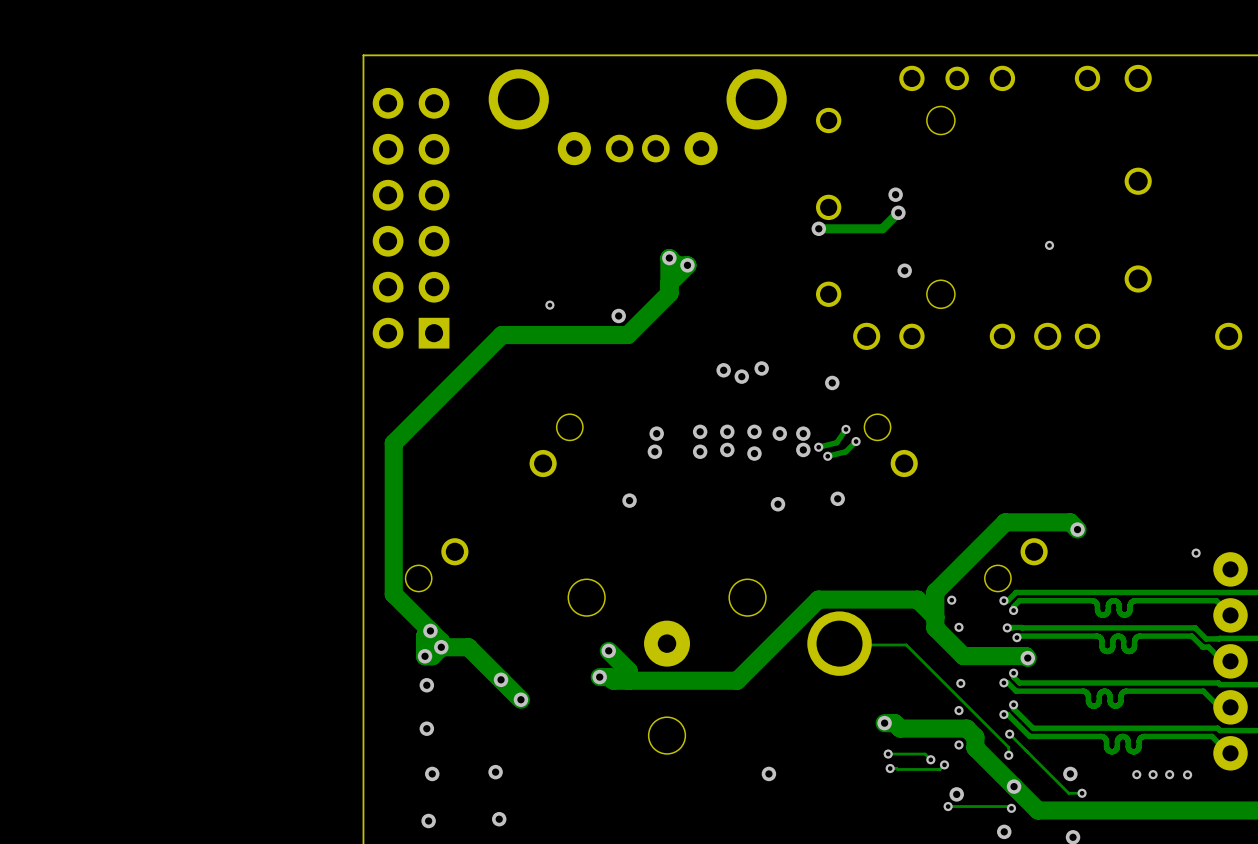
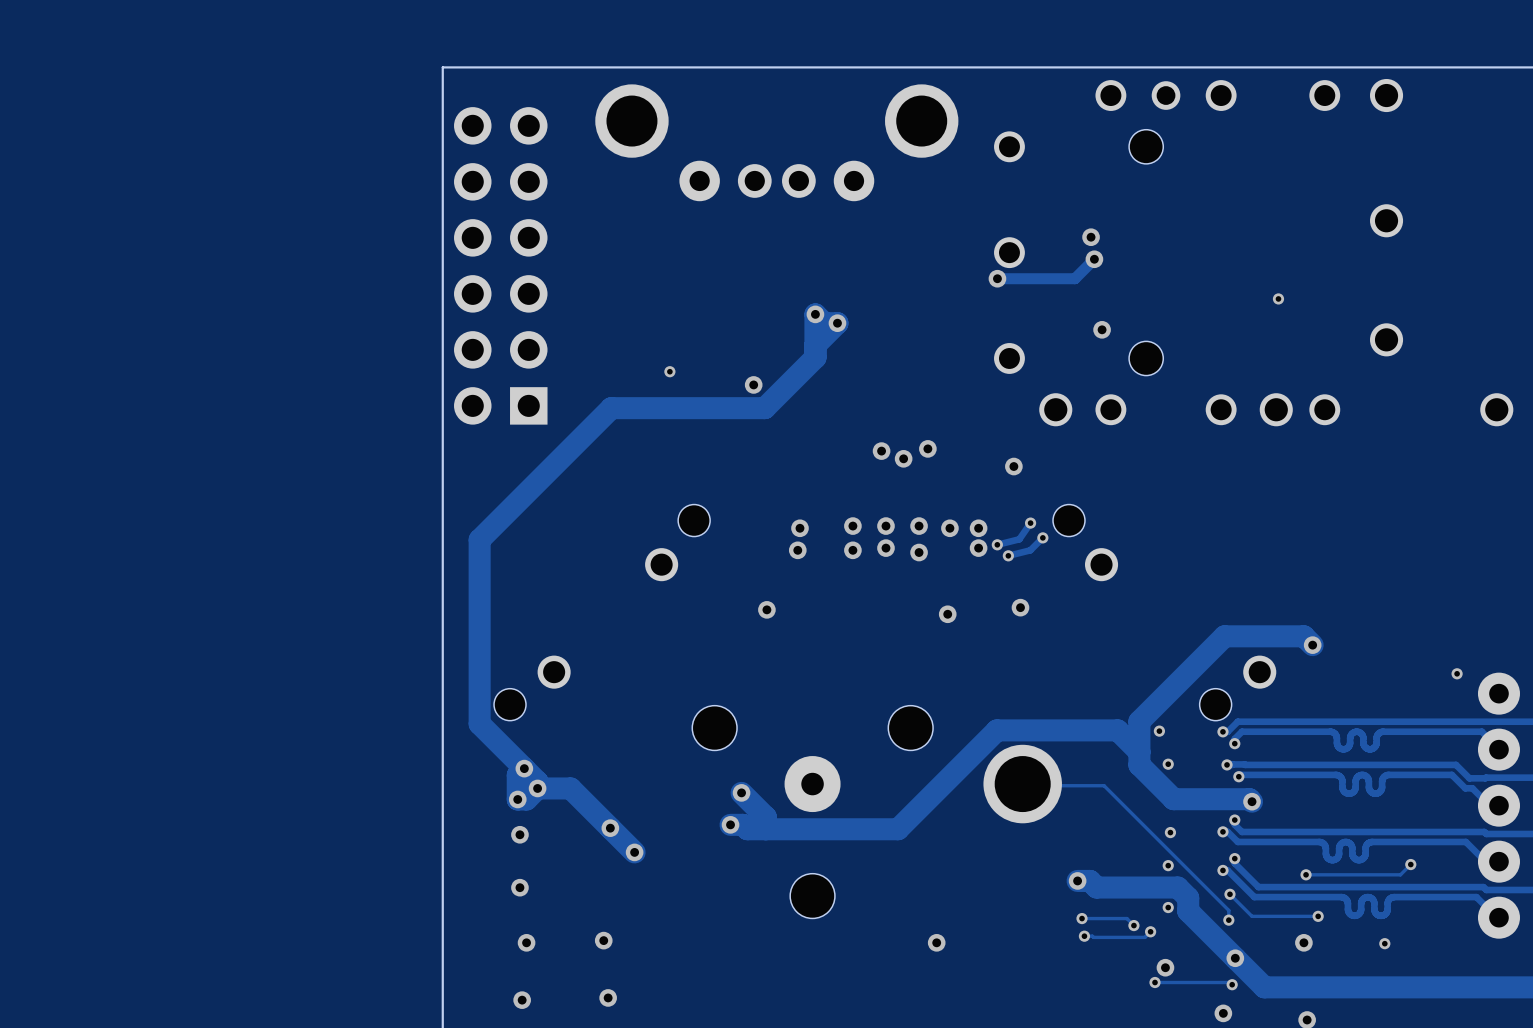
track: none -> (1410, 864) (1400, 874) (1306, 874)
via: none -> (1410, 864)
via: none -> (1306, 874)
track: (1027, 752) (1068, 793) (1082, 793) -> (1252, 916) (1318, 916)
via: none -> (1318, 916)
via: (1153, 774) -> none
via: (1169, 774) -> none
via: (1187, 774) -> none
via: (1082, 793) -> none

